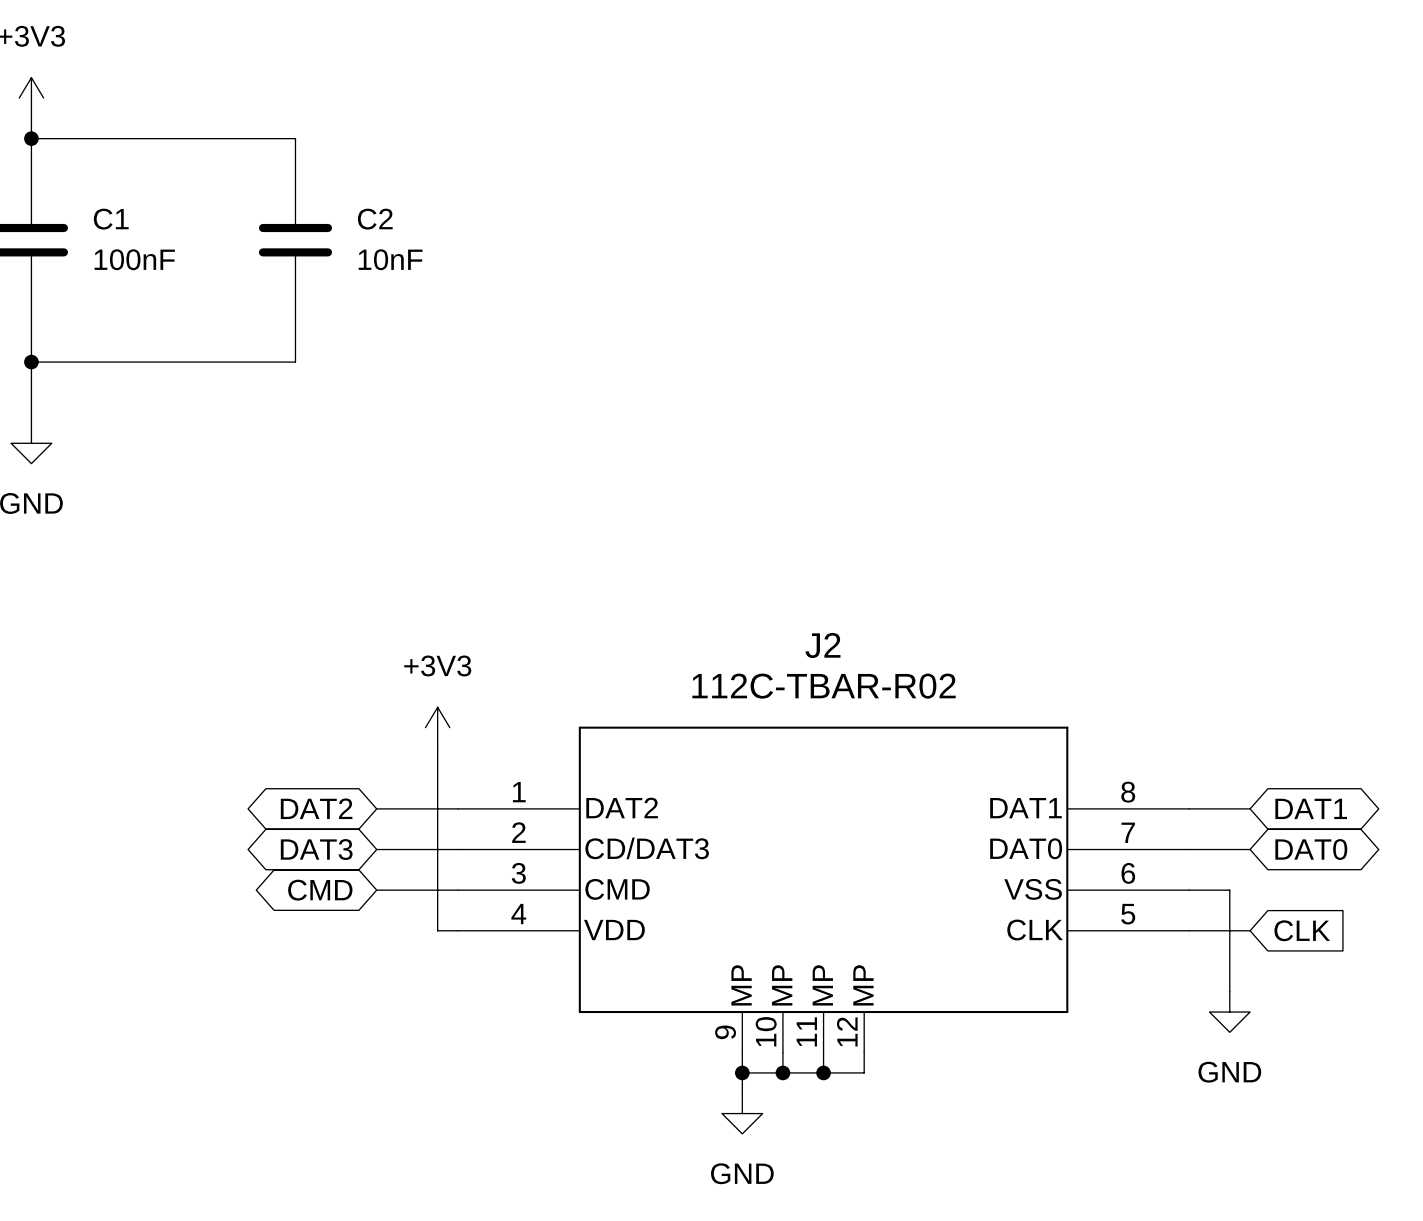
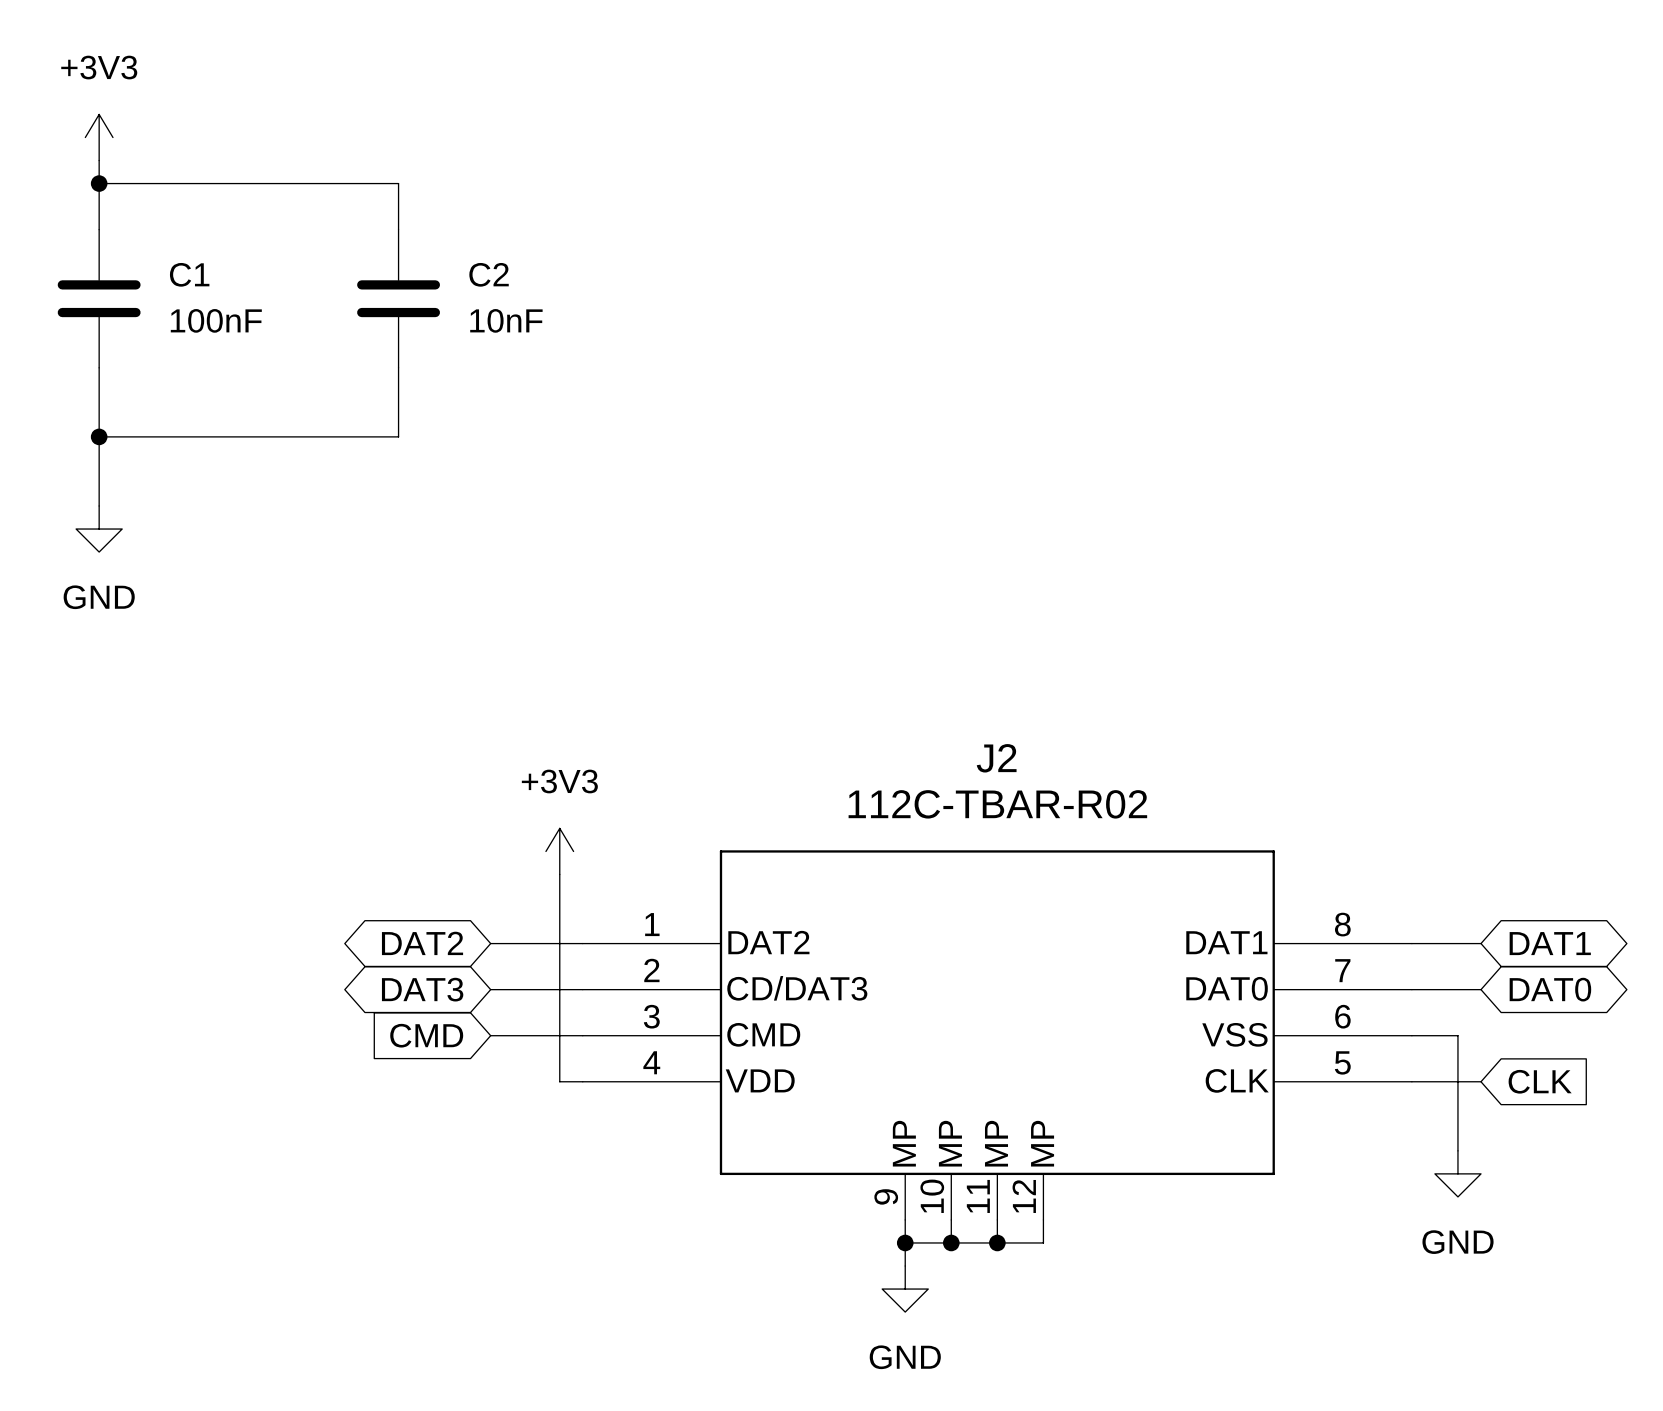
global label shape: bidirectional (320, 890) -> input (426, 1035)

